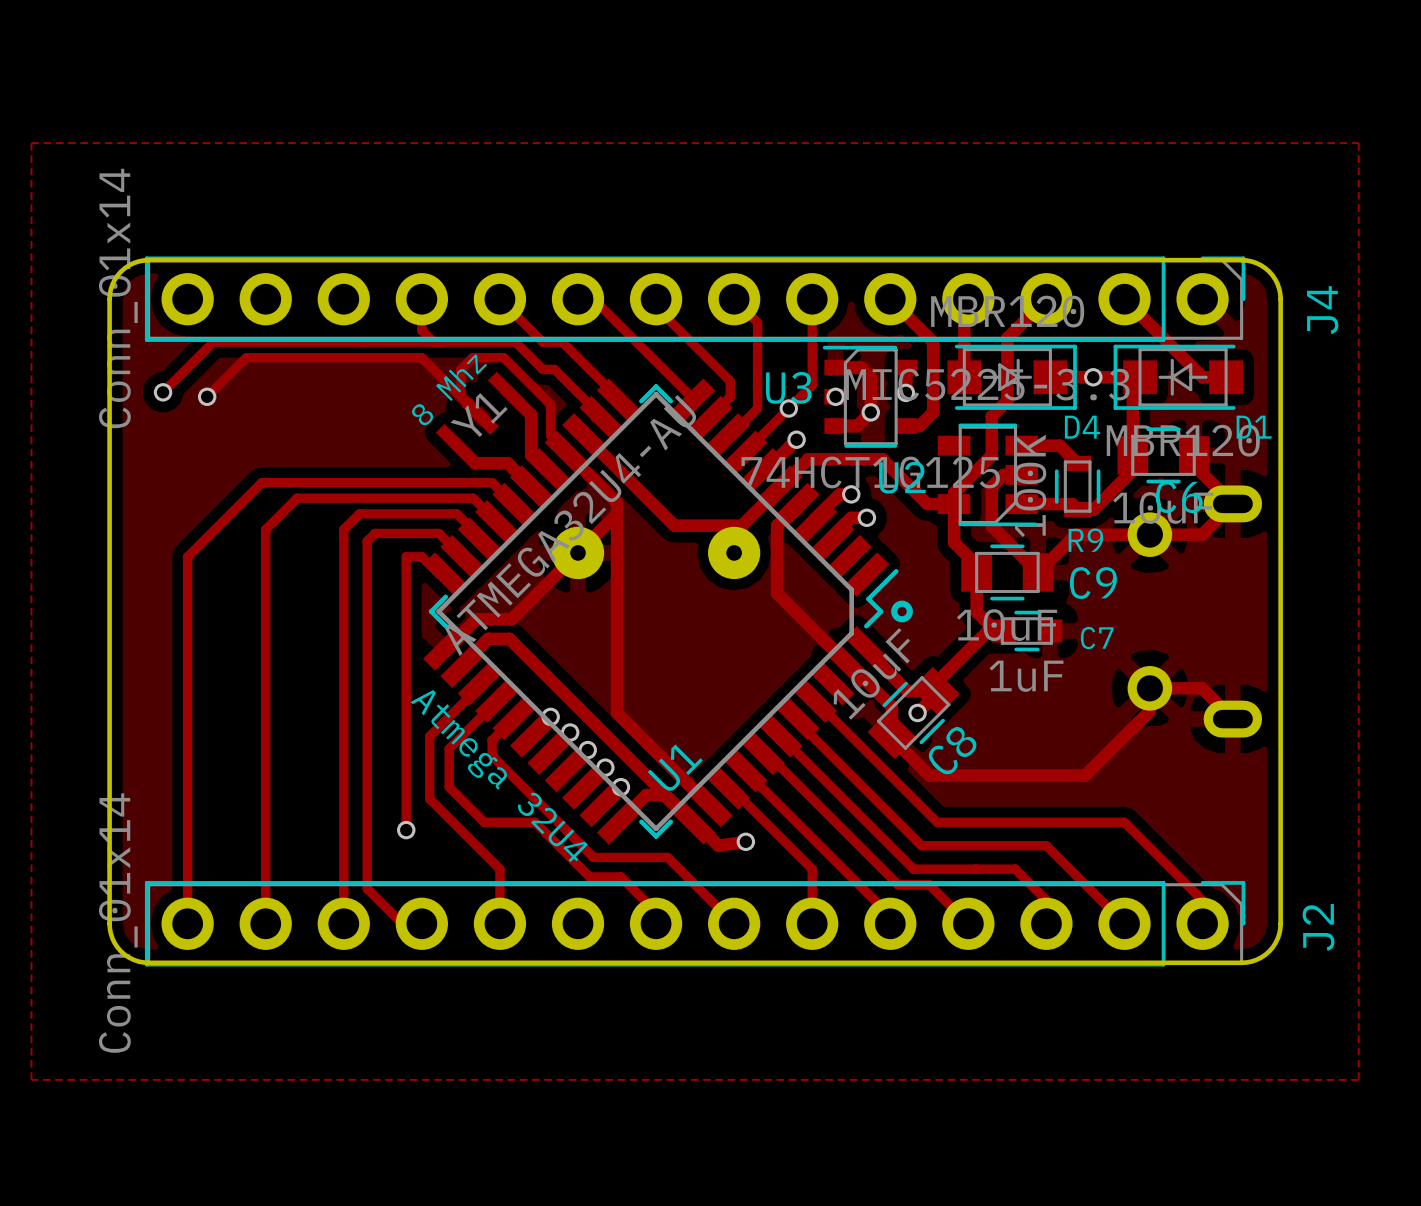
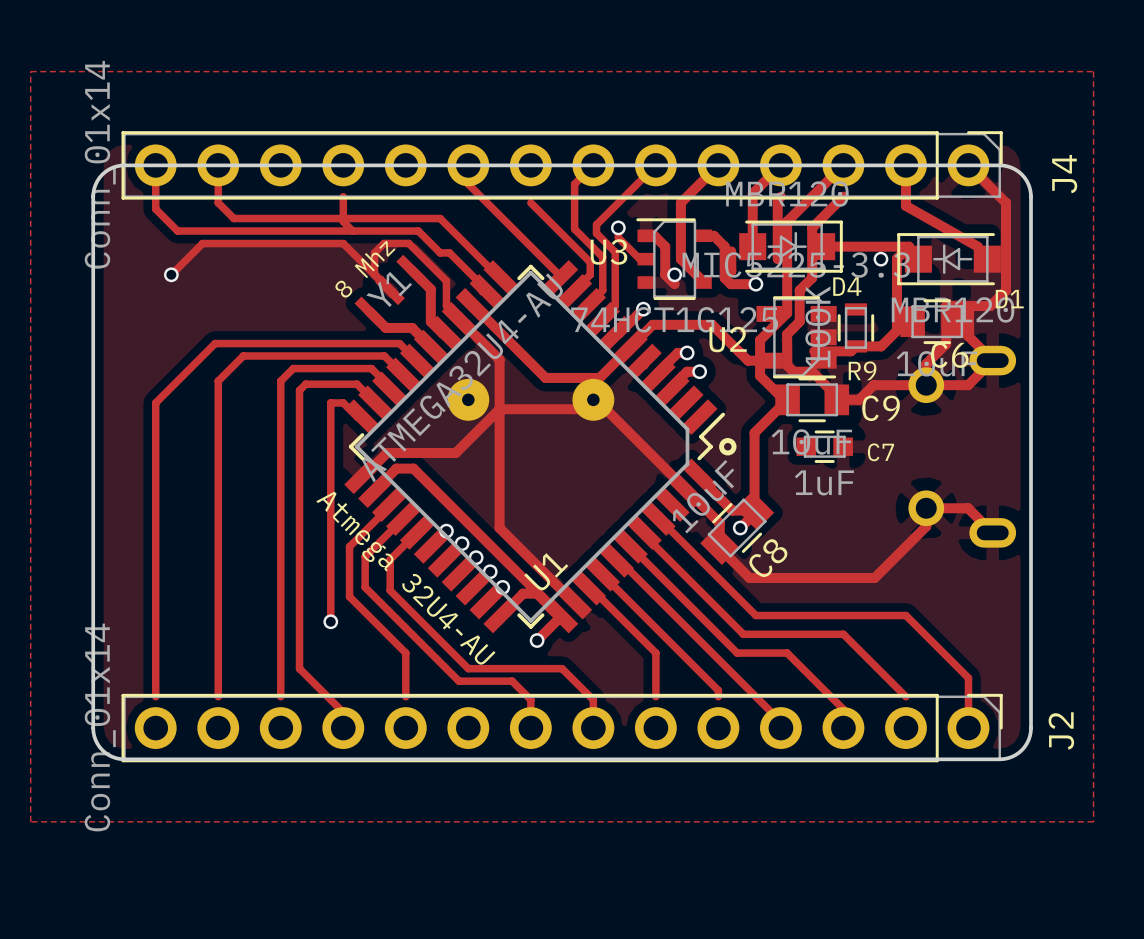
track: none -> (218, 165) (218, 202) (233, 218) (440, 218) (499, 277)
track: none -> (718, 165) (680, 202) (680, 259) (703, 282)
track: none -> (780, 165) (752, 193) (752, 246)
track: none -> (905, 165) (905, 205) (977, 246)
track: none -> (968, 165) (1006, 202) (1006, 290) (990, 306) (946, 306) (946, 343) (926, 363) (926, 385)
track: (499, 299) (542, 342) (562, 342) (619, 400) -> none
J4 position: (695, 299) -> (562, 165)
track: (734, 299) (757, 322) (757, 408) (730, 435) (727, 435) -> (593, 165) (574, 184) (574, 229) (602, 257) (602, 290) (588, 304)
track: (812, 299) (812, 385) (761, 435) -> (655, 165) (596, 224) (596, 233) (615, 252) (615, 306)
track: (890, 299) (933, 342) (933, 412) (919, 426) (906, 426) -> none
track: (1124, 299) (1202, 377) (1226, 377) -> none
track: none -> (618, 227) (618, 237) (639, 259) (646, 259)
via: none -> (618, 227)
track: (214, 342) (163, 392) -> (177, 231) (155, 209) (155, 165)
track: none -> (646, 235) (654, 235) (665, 246) (665, 274) (674, 284)
track: none -> (703, 235) (713, 235) (724, 246) (724, 277) (730, 284) (755, 284)
track: none -> (821, 246) (909, 246) (896, 258) (896, 330) (881, 346) (855, 346) (851, 351) (814, 351)
track: (835, 367) (861, 367) (870, 377) (870, 412) (857, 426) (835, 426) -> none
D4 position: (1012, 377) -> (790, 246)
track: (1050, 377) (1140, 377) (1132, 384) (1132, 470) (1093, 509) (1077, 509) (1072, 504) (1021, 504) -> none
via: (163, 392) -> none
via: (905, 392) -> none
U3 position: (870, 396) -> (674, 259)
via: (788, 408) -> none
via: none -> (755, 284)
via: (870, 412) -> none
track: (1021, 445) (1059, 445) (1077, 463) -> none
track: (976, 470) (954, 493) (954, 542) (976, 565) (976, 611) (995, 631) -> none
track: (1021, 474) (1003, 474) (991, 486) (991, 526) (1038, 572) (1075, 534) (1084, 534) -> (787, 334) (787, 365) (793, 371) (812, 371) (836, 396) (836, 399) (859, 399) (873, 385)
R9 position: (1077, 486) -> (855, 327)
track: (797, 505) (777, 525) (777, 593) (849, 665) -> none
track: (617, 513) (511, 619) -> (685, 489) (605, 409) (499, 409) (455, 452) (415, 452)
C9 position: (1007, 572) -> (812, 399)
track: (1003, 631) (987, 631) (935, 683) -> (843, 165) (787, 221) (787, 313) (760, 340) (760, 375) (784, 399) (787, 399) (754, 432) (754, 504)
C7 position: (1026, 631) -> (824, 446)
track: (514, 717) (492, 740) (492, 755) (593, 857) (667, 857) (734, 923) -> (417, 532) (390, 559) (390, 590) (468, 668) (562, 668) (593, 699) (593, 728)
text: Atmega 32U4 (499, 776) -> Atmega 32U4-AU (405, 578)
track: (484, 822) (535, 822) (589, 876) (620, 876) (656, 912) (656, 923) -> (393, 615) (458, 681) (512, 681) (530, 699) (530, 728)
track: (693, 822) (718, 845) (745, 841) -> none
track: none -> (560, 617) (537, 640)
via position: (745, 841) -> (537, 640)
track: (976, 869) (1015, 869) (1046, 900) (1046, 923) -> (787, 653) (843, 709) (843, 728)
track: (898, 884) (929, 884) (968, 923) -> (724, 665) (780, 721) (780, 728)
track: none -> (968, 678) (968, 728)
board edge: (109, 923) (112, 938) (121, 951) (133, 959) (148, 962) (1241, 962) (1256, 959) (1269, 951) (1277, 938) (1280, 923) -> (93, 696) (93, 732) (97, 743) (108, 755) (124, 759) (1003, 759) (1018, 752) (1028, 740) (1031, 728) (1031, 696)
J2 position: (695, 923) -> (562, 728)

